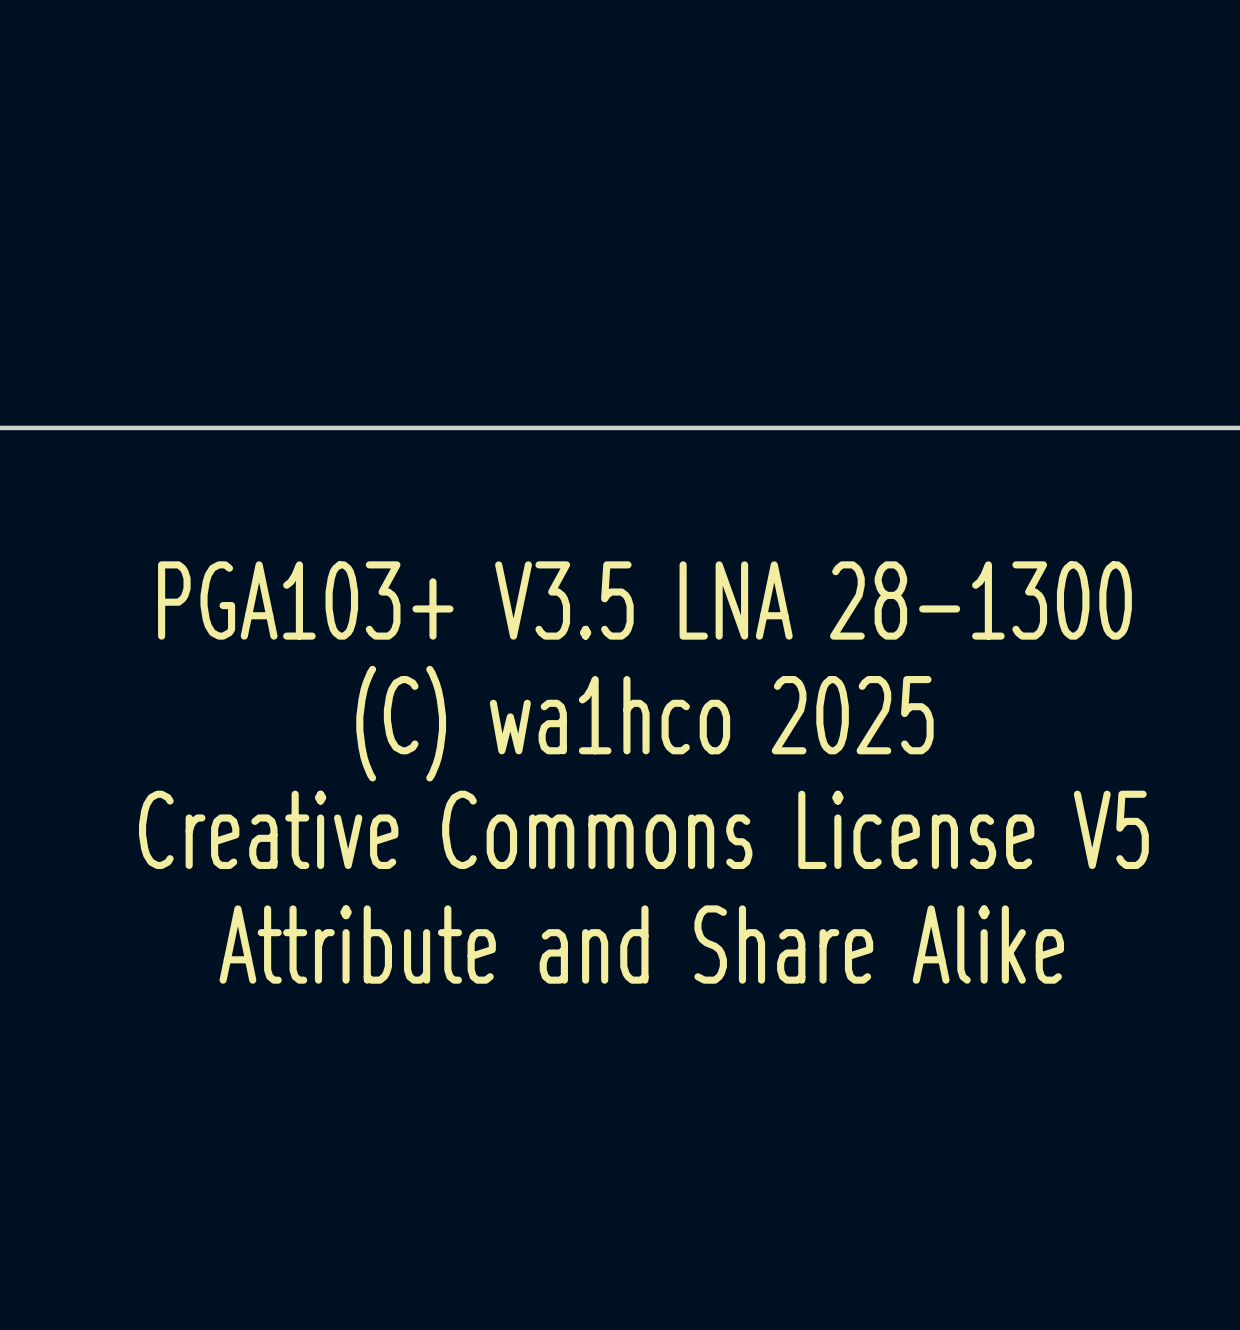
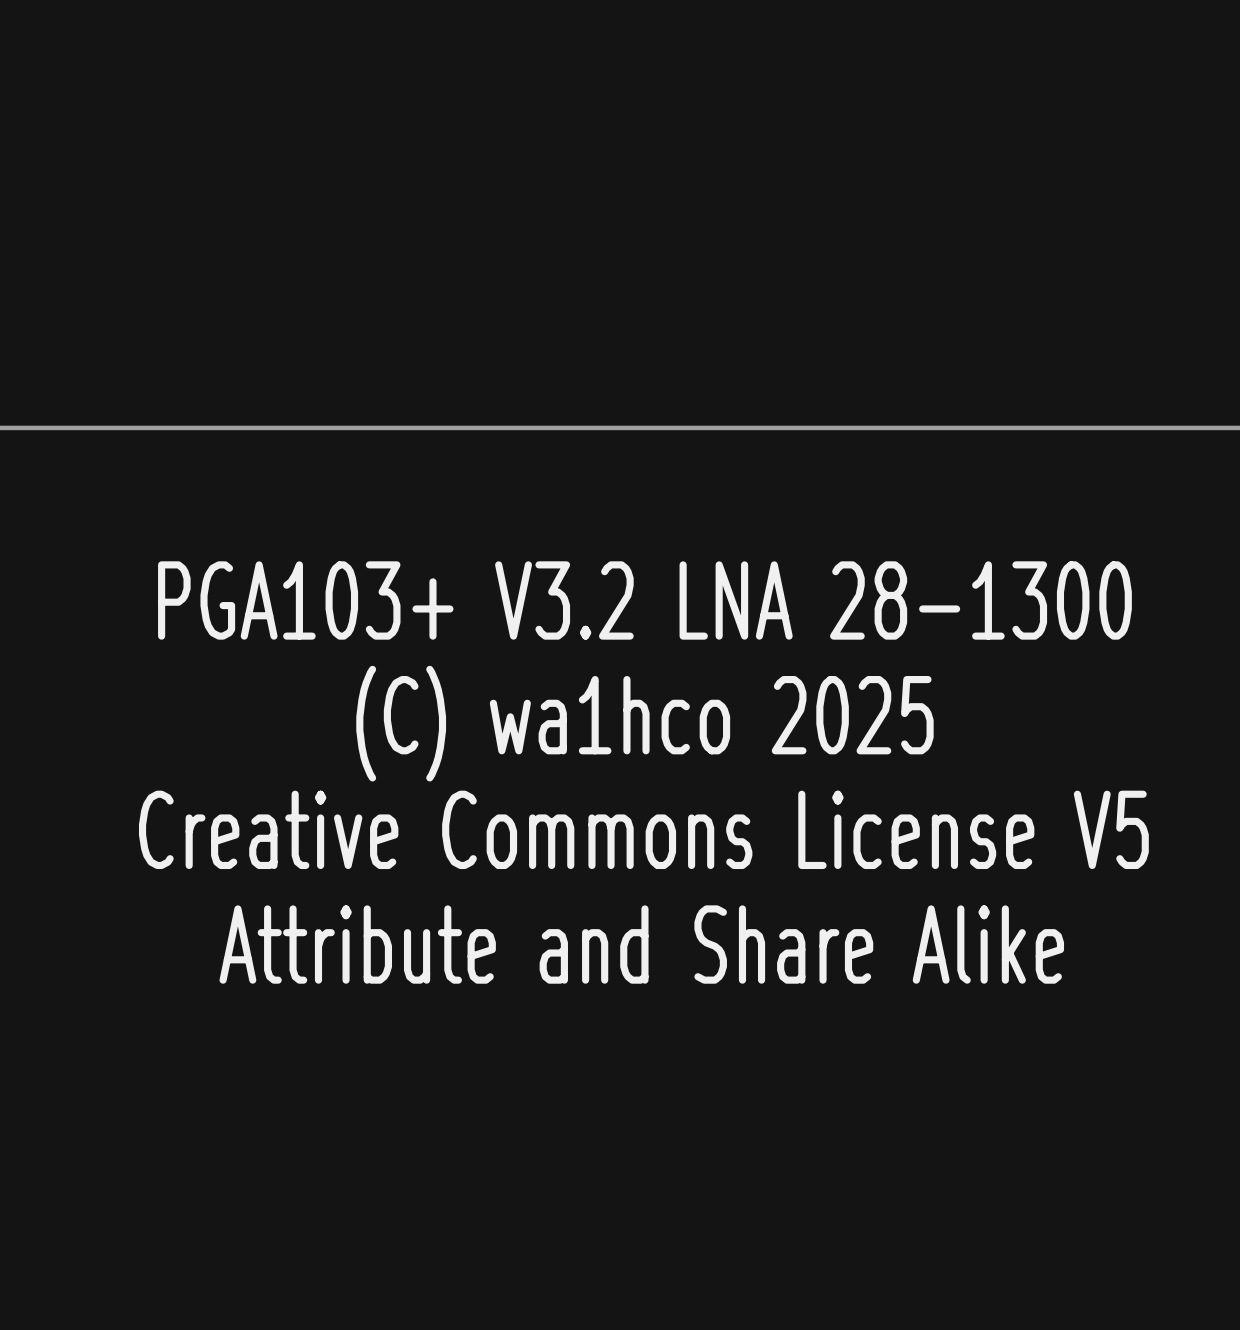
text: PGA103+ V3.5 LNA 28-1300 (644, 600) -> PGA103+ V3.2 LNA 28-1300 (644, 600)

